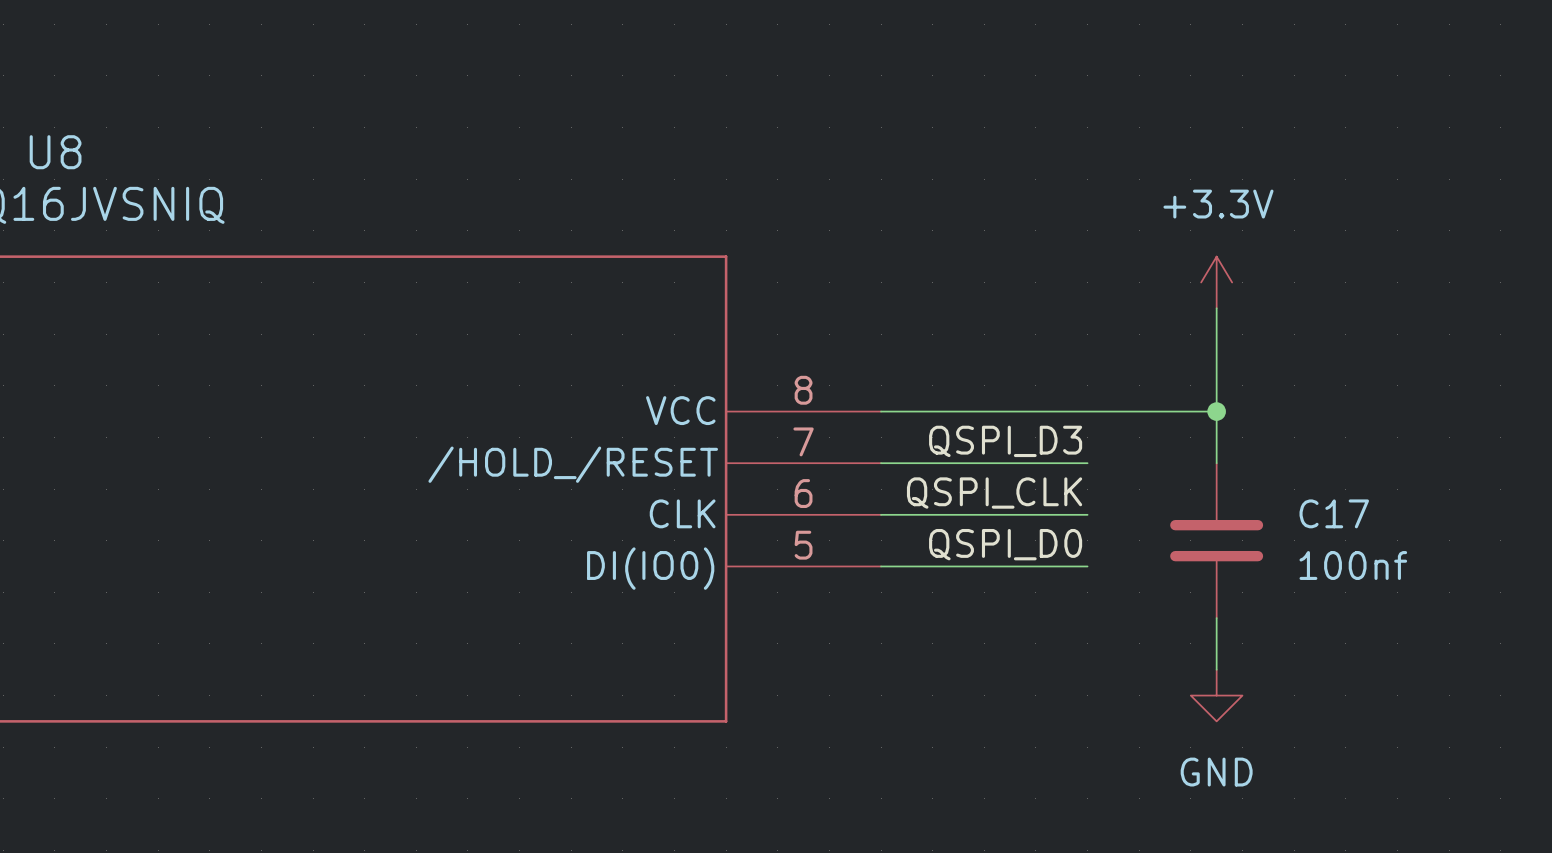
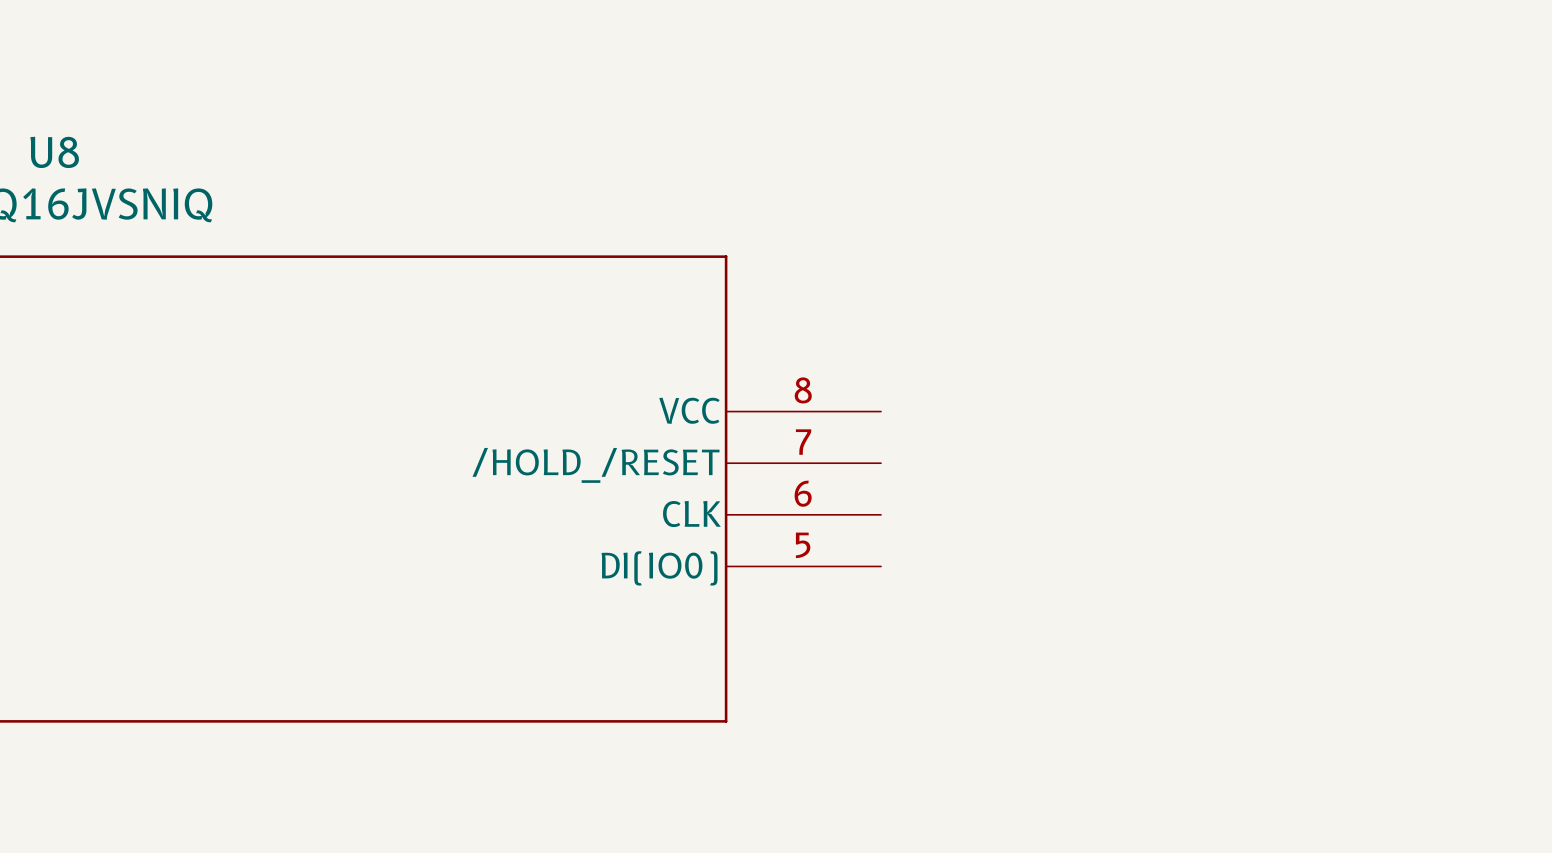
power symbol: +3.3V (1216, 282) -> none
wire: (1216, 308) (1216, 463) -> none
wire: (881, 411) (1216, 411) -> none
junction: (1216, 411) -> none
label: QSPI_D3 (1005, 441) -> none
wire: (881, 463) (1087, 463) -> none
label: QSPI_CLK (994, 493) -> none
wire: (881, 514) (1087, 514) -> none
C17: 100nf (1216, 540) -> none
label: QSPI_D0 (1005, 544) -> none
wire: (881, 566) (1087, 566) -> none
wire: (1216, 618) (1216, 669) -> none
power symbol: GND (1216, 695) -> none

